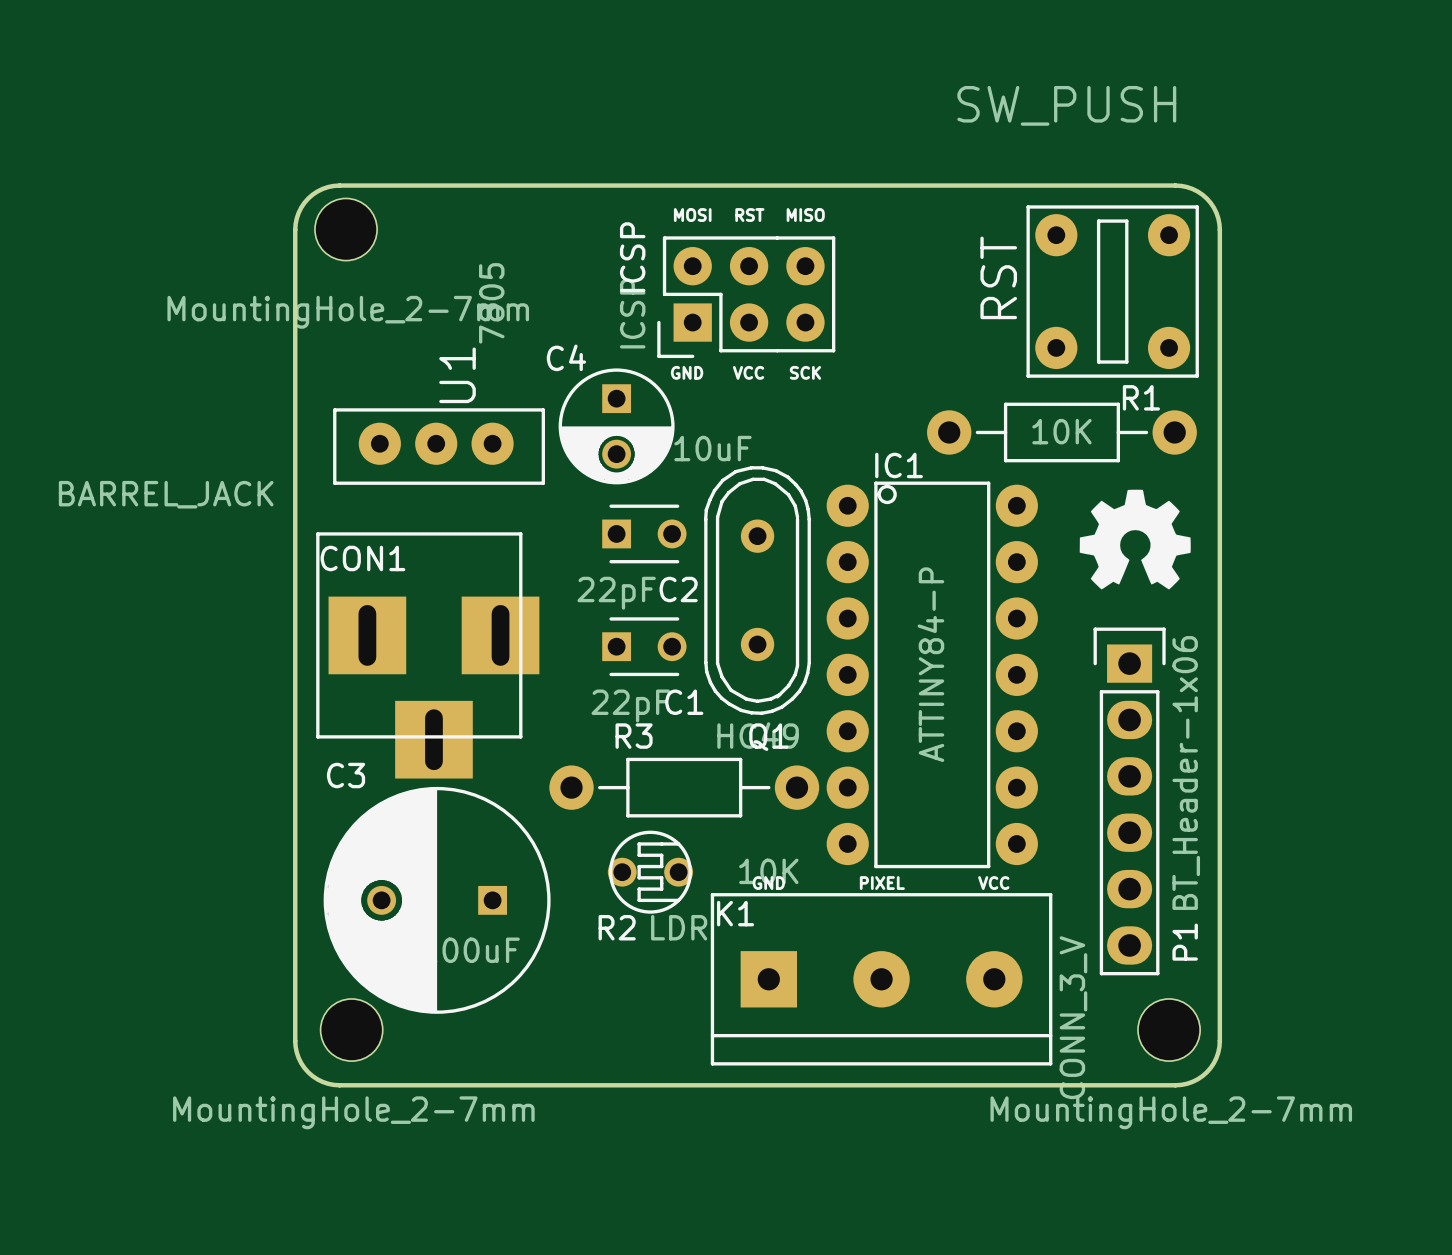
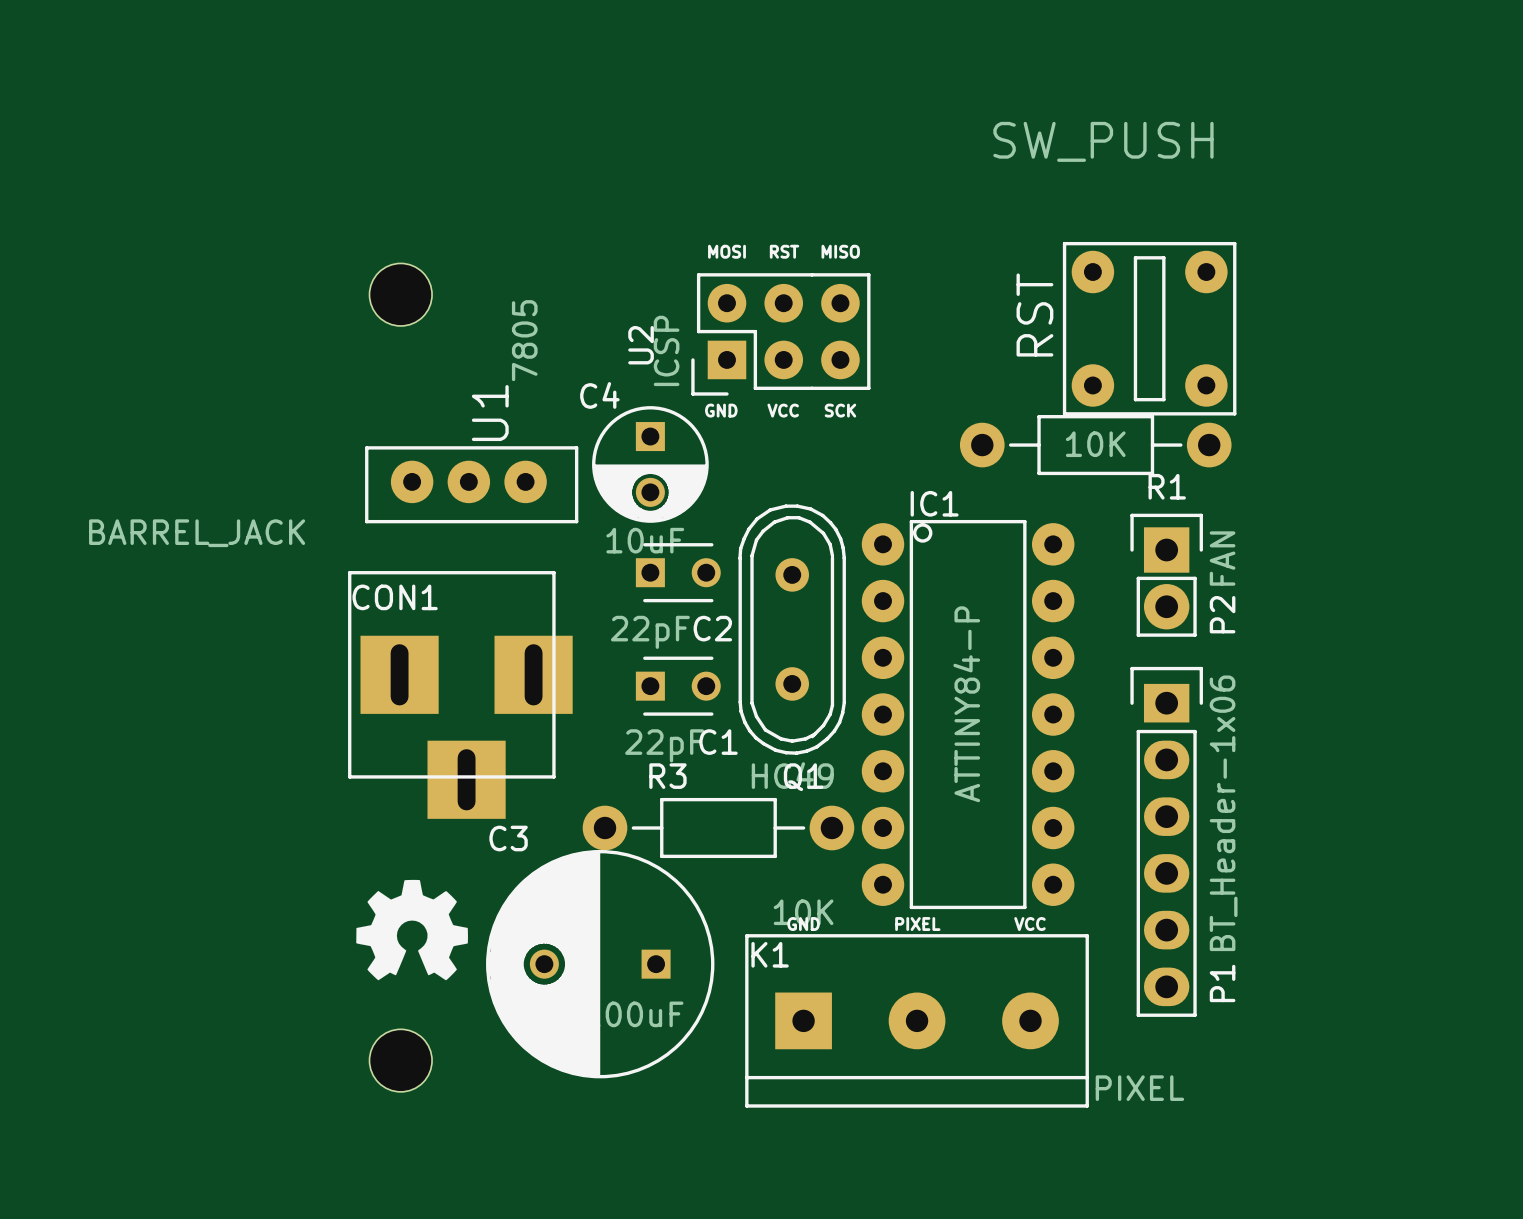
board edge: (339, 185) (1175, 185) (1192, 188) (1206, 198) (1216, 212) (1219, 229) (1219, 1040) (1216, 1057) (1206, 1072) (1192, 1081) (1175, 1085) (339, 1085) (322, 1081) (308, 1072) (298, 1057) (295, 1040) (295, 229) (298, 212) (308, 198) (322, 188) (339, 185) -> none
part: MountingHole_2-7mm (346, 229) -> none
part: none -> (400, 294)
ICSP name: ICSP (632, 257) -> U2 (641, 345)
R1 name position: R1 (1141, 397) -> R1 (1167, 486)
R1 position: (1061, 432) -> (1095, 445)
C4 value position: 10uF (712, 448) -> 10uF (645, 540)
drawing: [1079, 489, 1191, 590] -> none
P2: none -> FAN (1166, 575)
drawing: none -> [356, 879, 468, 981]
R2: LDR (650, 872) -> none
C3 position: (437, 900) -> (600, 964)
K1 value: CONN_3_V (1073, 1017) -> PIXEL (1139, 1088)
part position: (351, 1030) -> (400, 1060)
part: MountingHole_2-7mm (1169, 1030) -> none
part value: MountingHole_2-7mm (353, 1112) -> none

